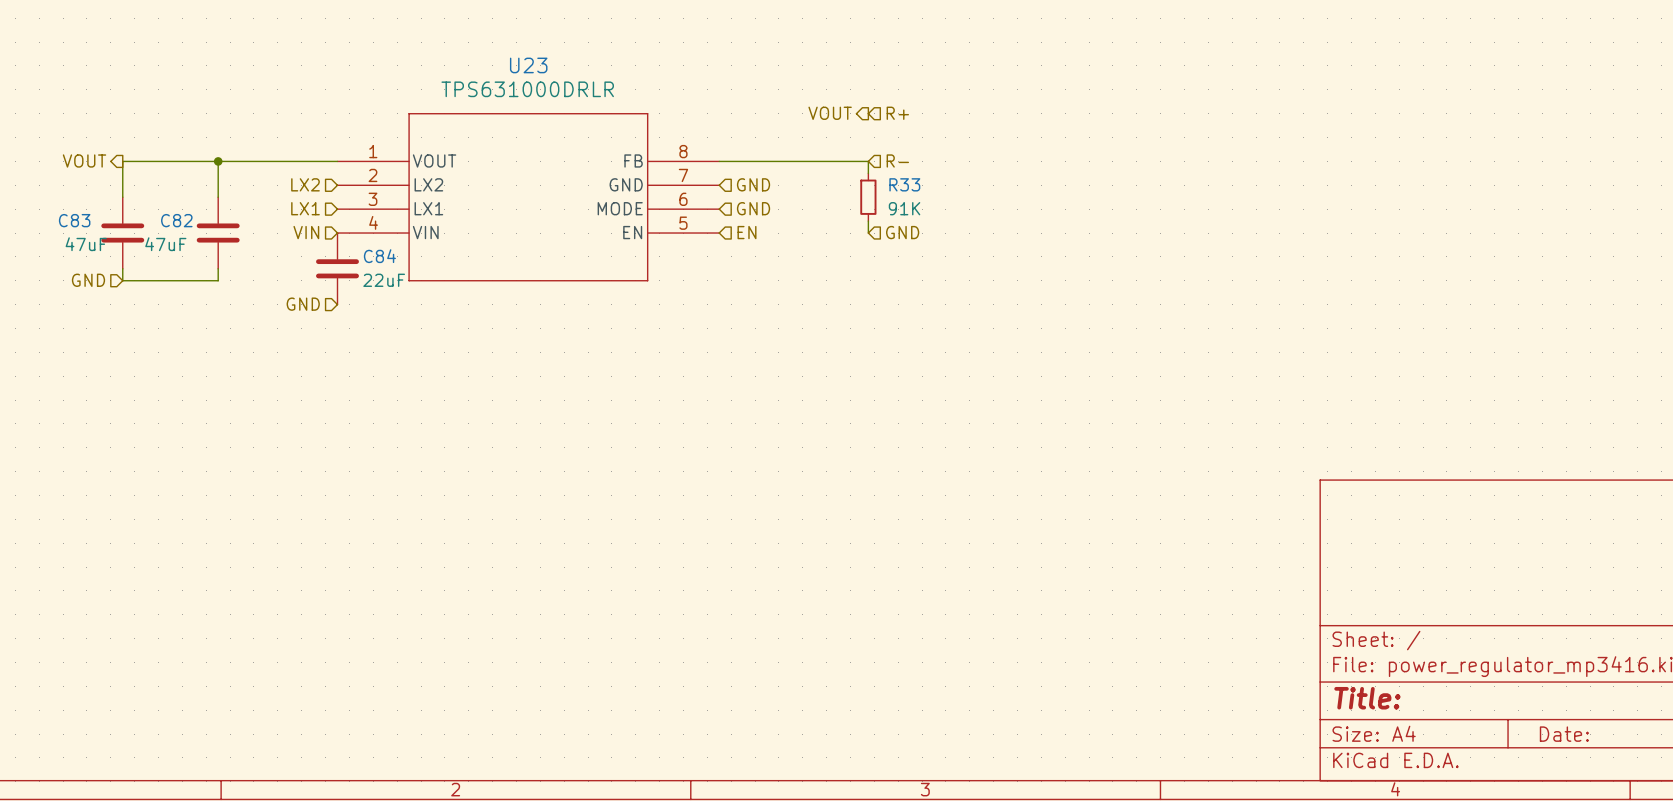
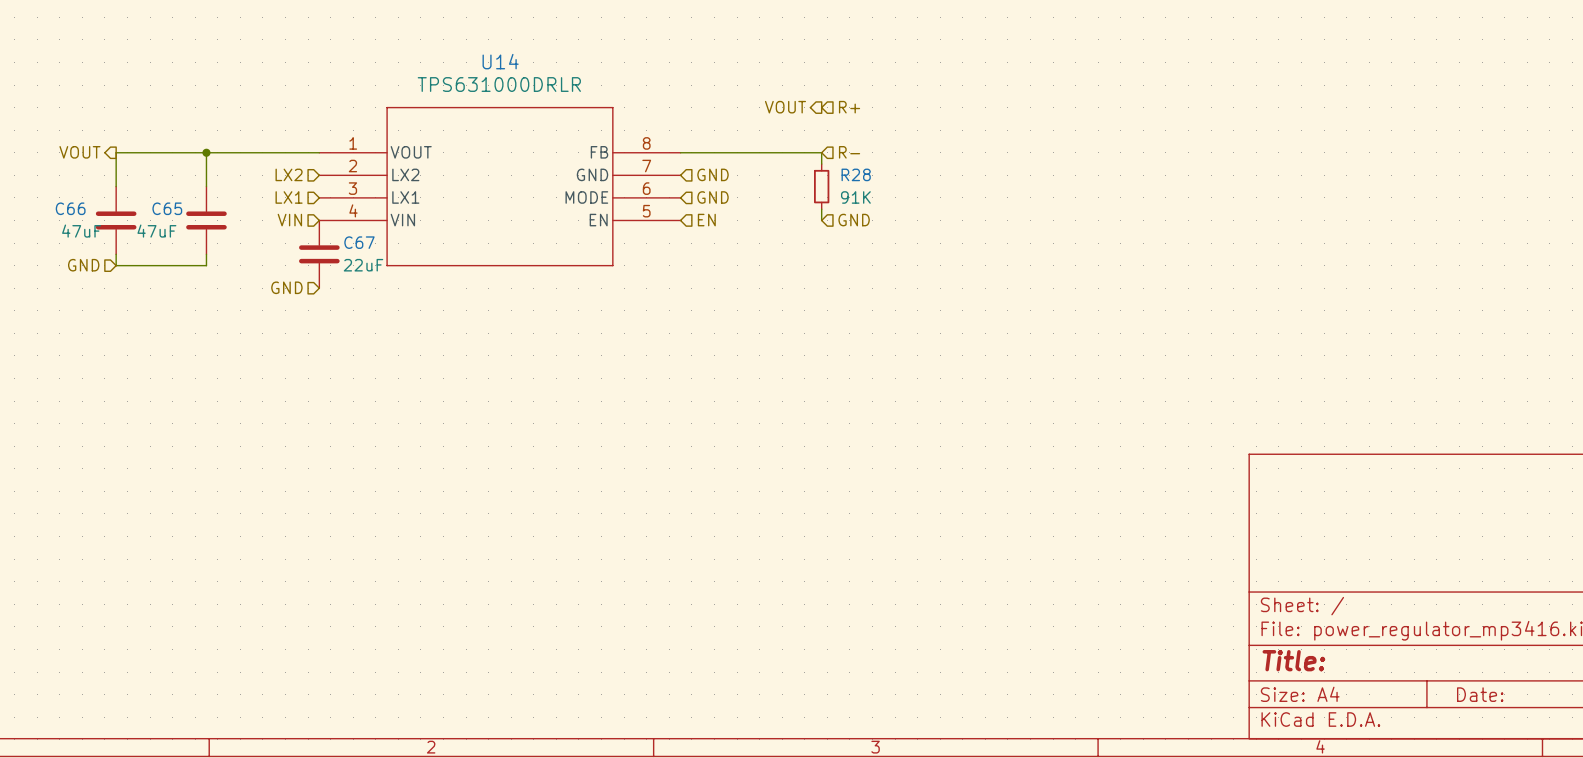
U23 name: U23 (528, 65) -> U14 (500, 61)
R33 name: R33 (904, 184) -> R28 (856, 174)
C83 name: C83 (74, 220) -> C66 (70, 208)
C82 name: C82 (176, 220) -> C65 (167, 208)
C84 name: C84 (379, 256) -> C67 (359, 242)

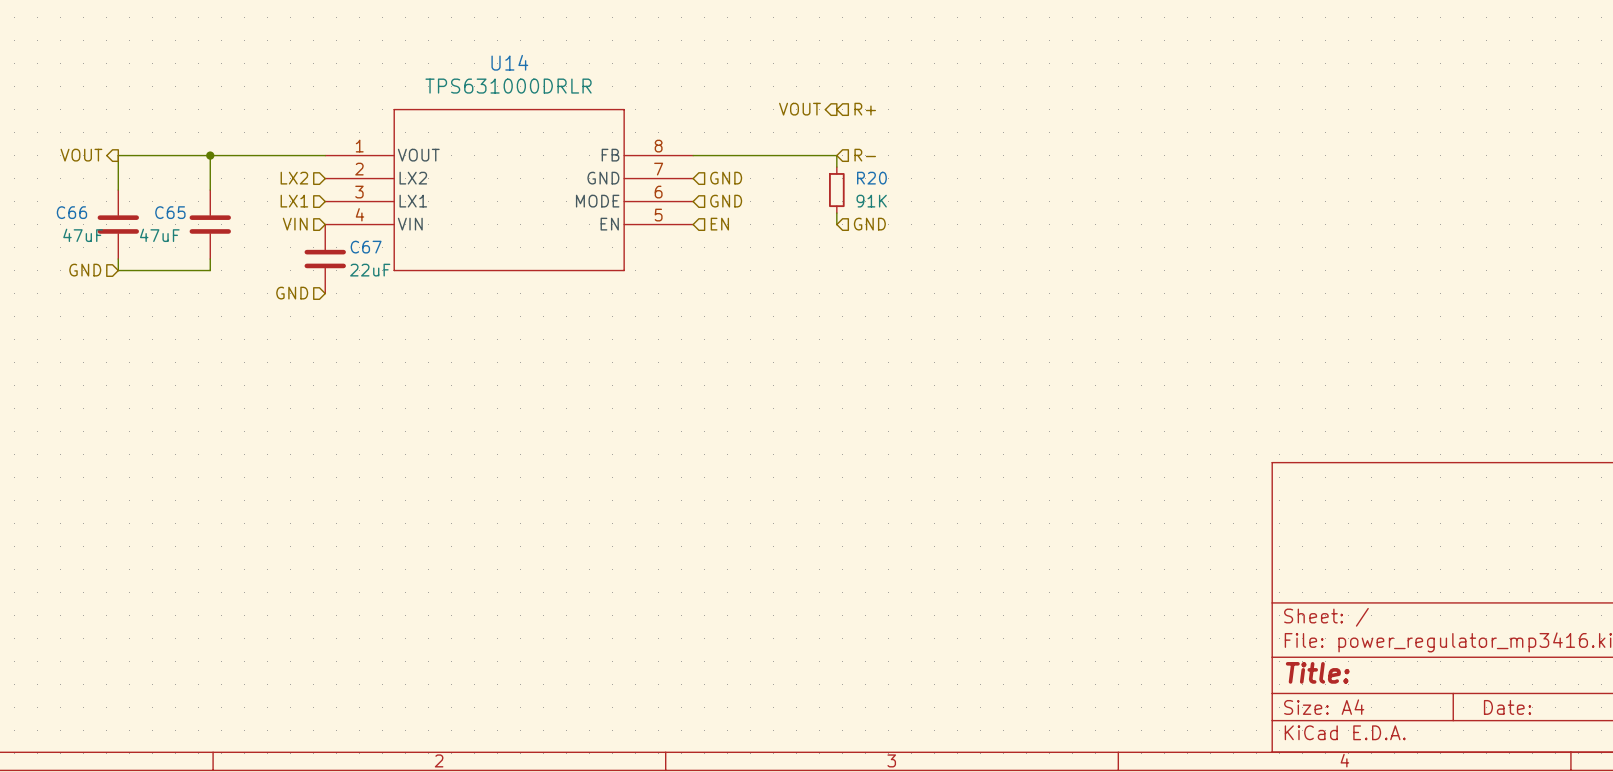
R28 name: R28 (856, 174) -> R20 (871, 178)

